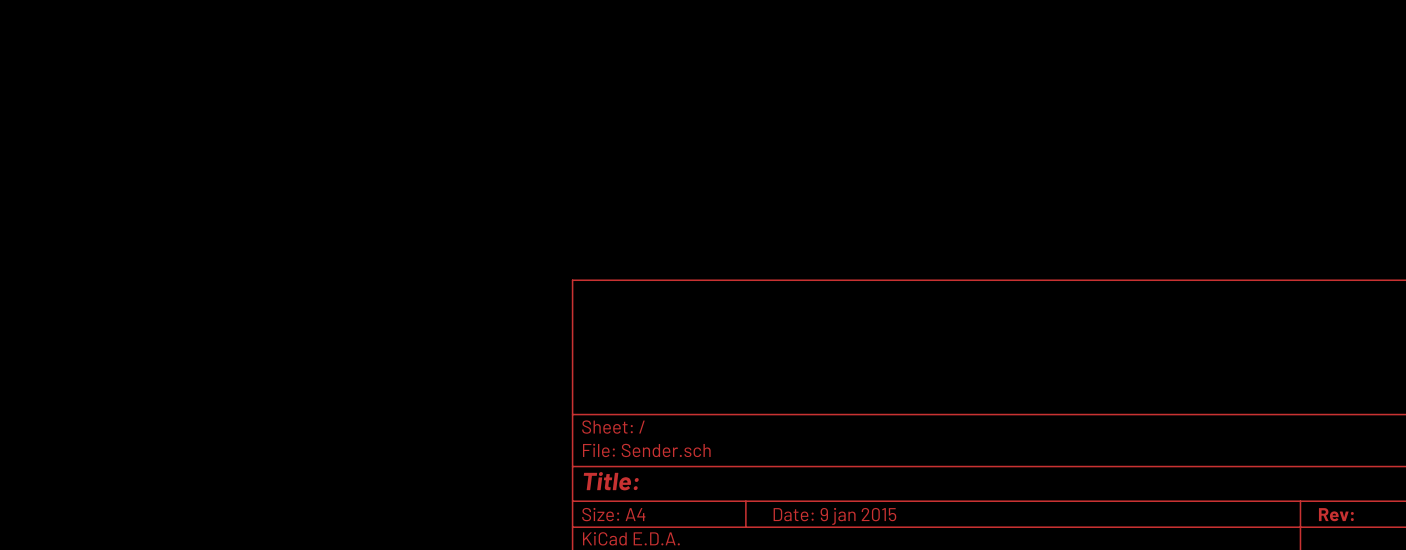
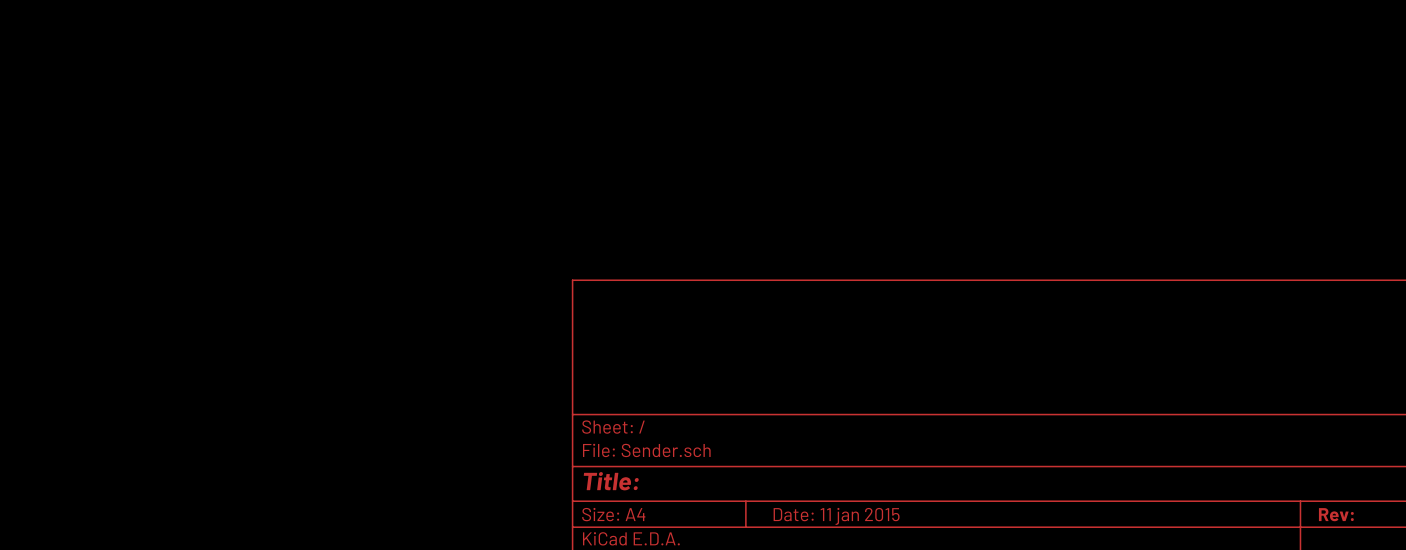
title block: Date: 9 jan 2015 (834, 516) -> Date: 11 jan 2015 (836, 516)

